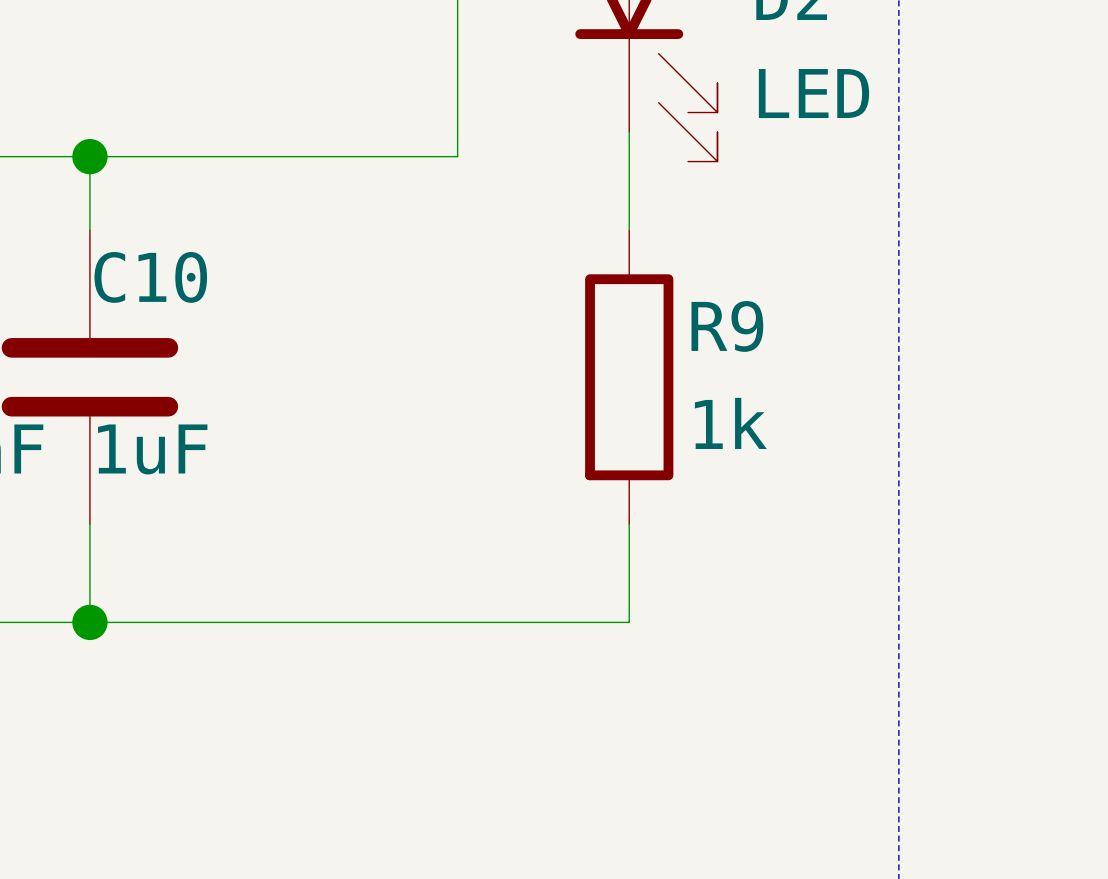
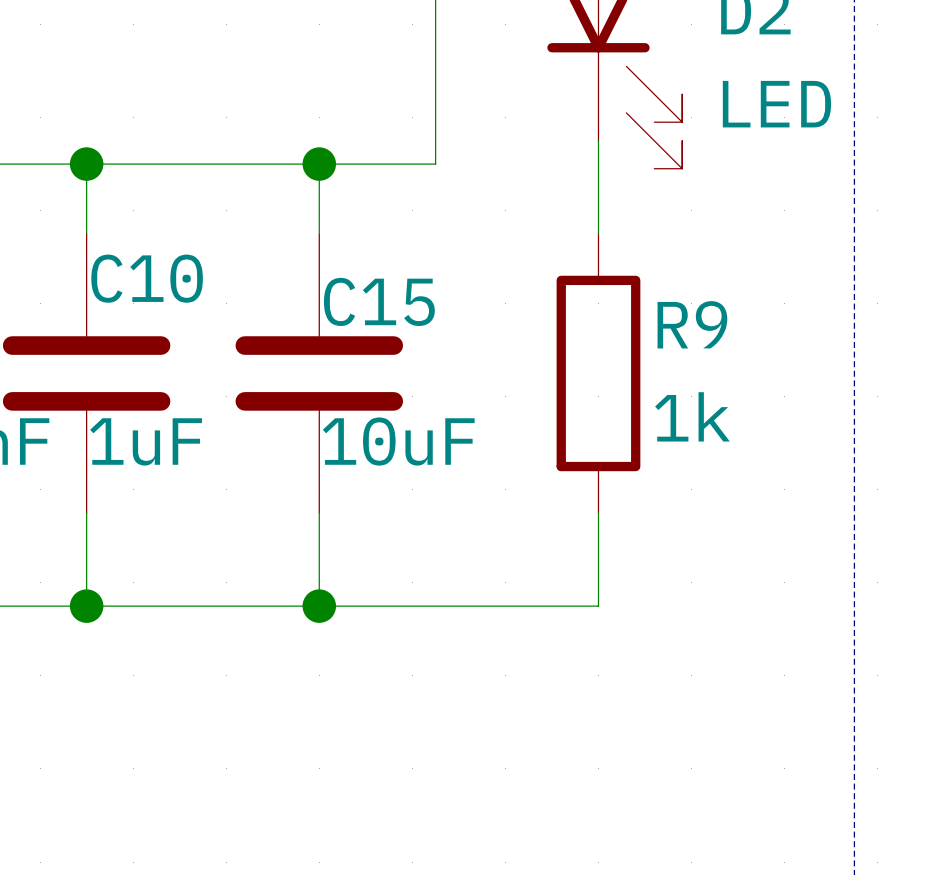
wire: none -> (319, 164) (319, 233)
junction: none -> (319, 164)
C15: none -> 10uF (319, 373)
wire: none -> (319, 513) (319, 606)
junction: none -> (319, 606)

